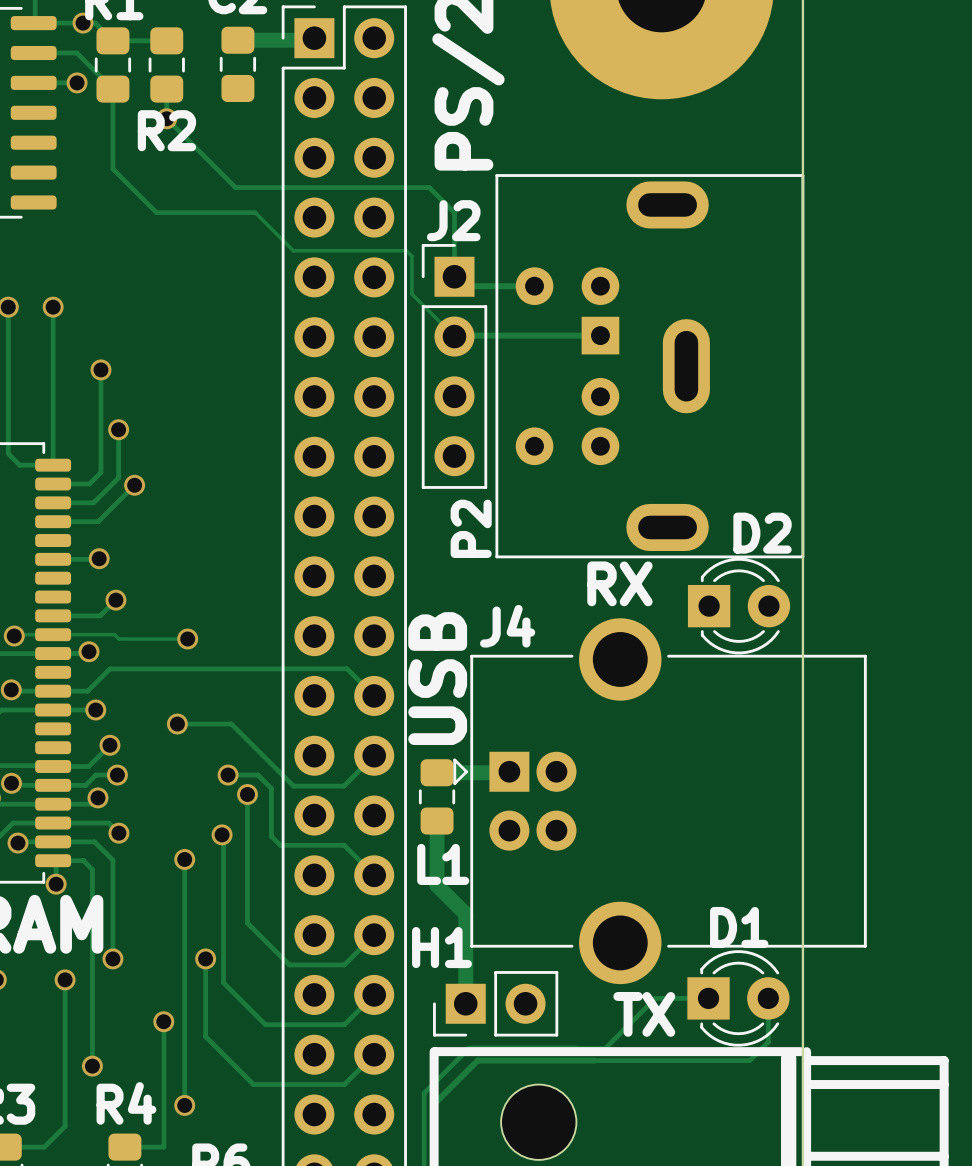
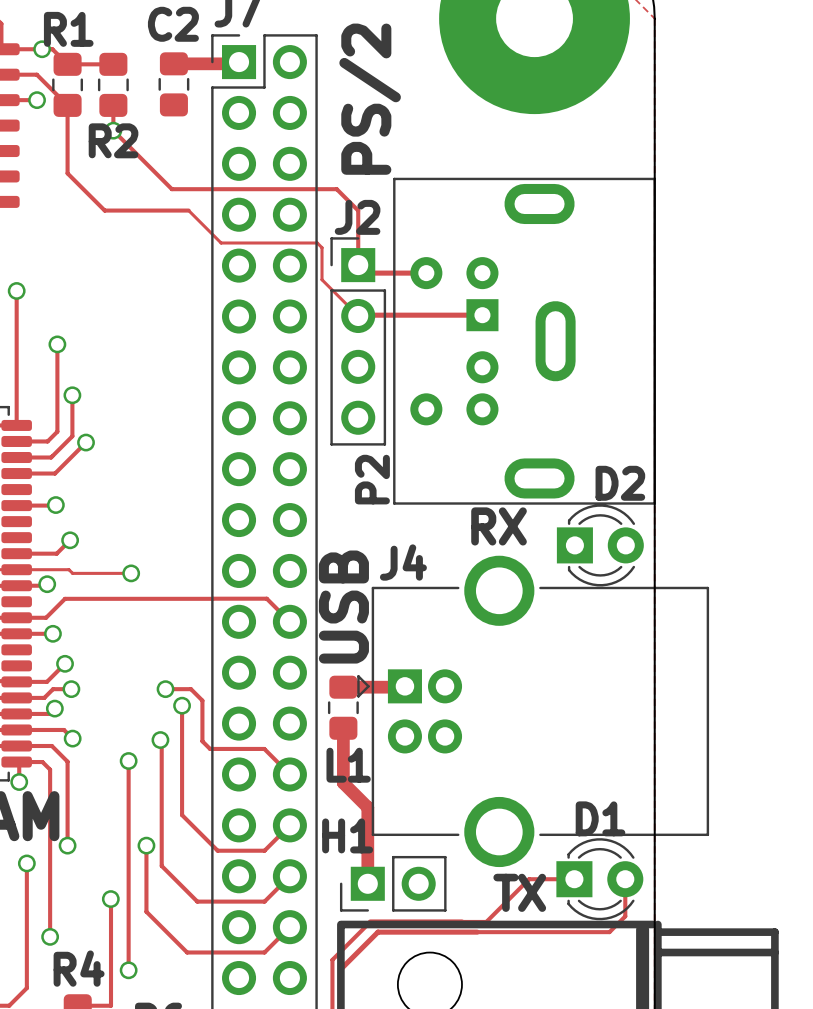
track: (177, 724) (231, 724) (293, 786) (343, 786) (374, 755) -> none
via: (177, 724) -> none

